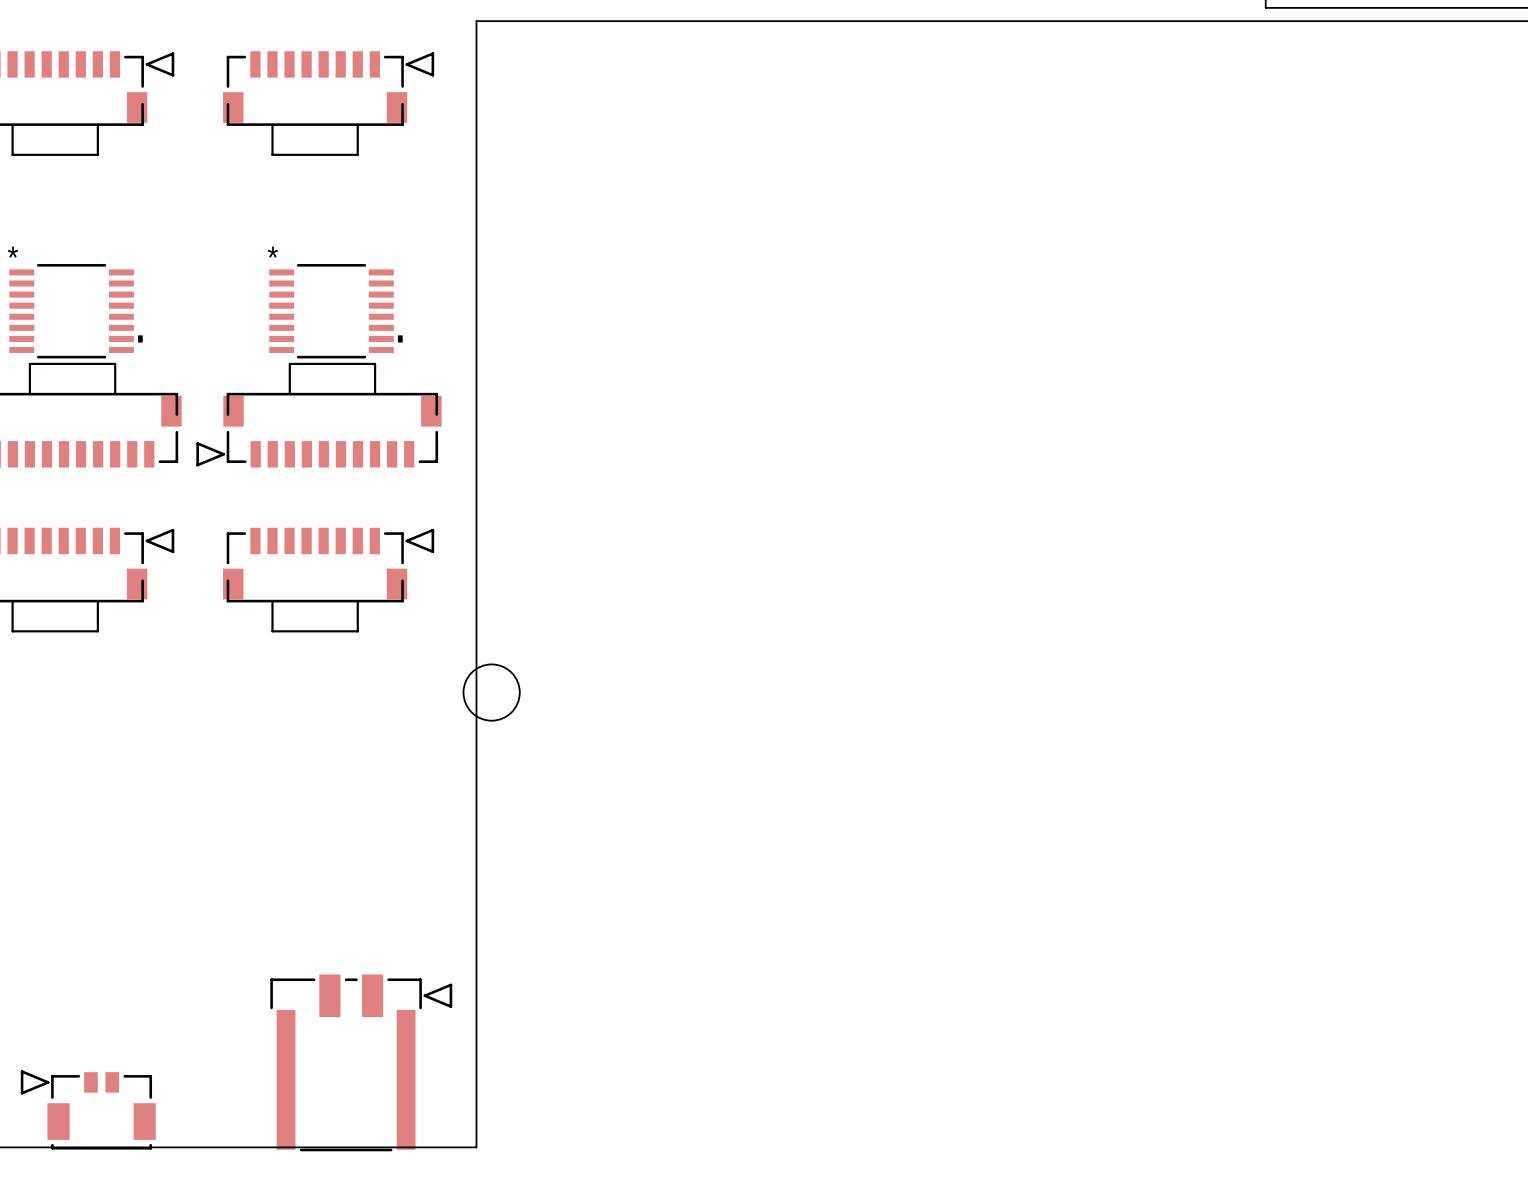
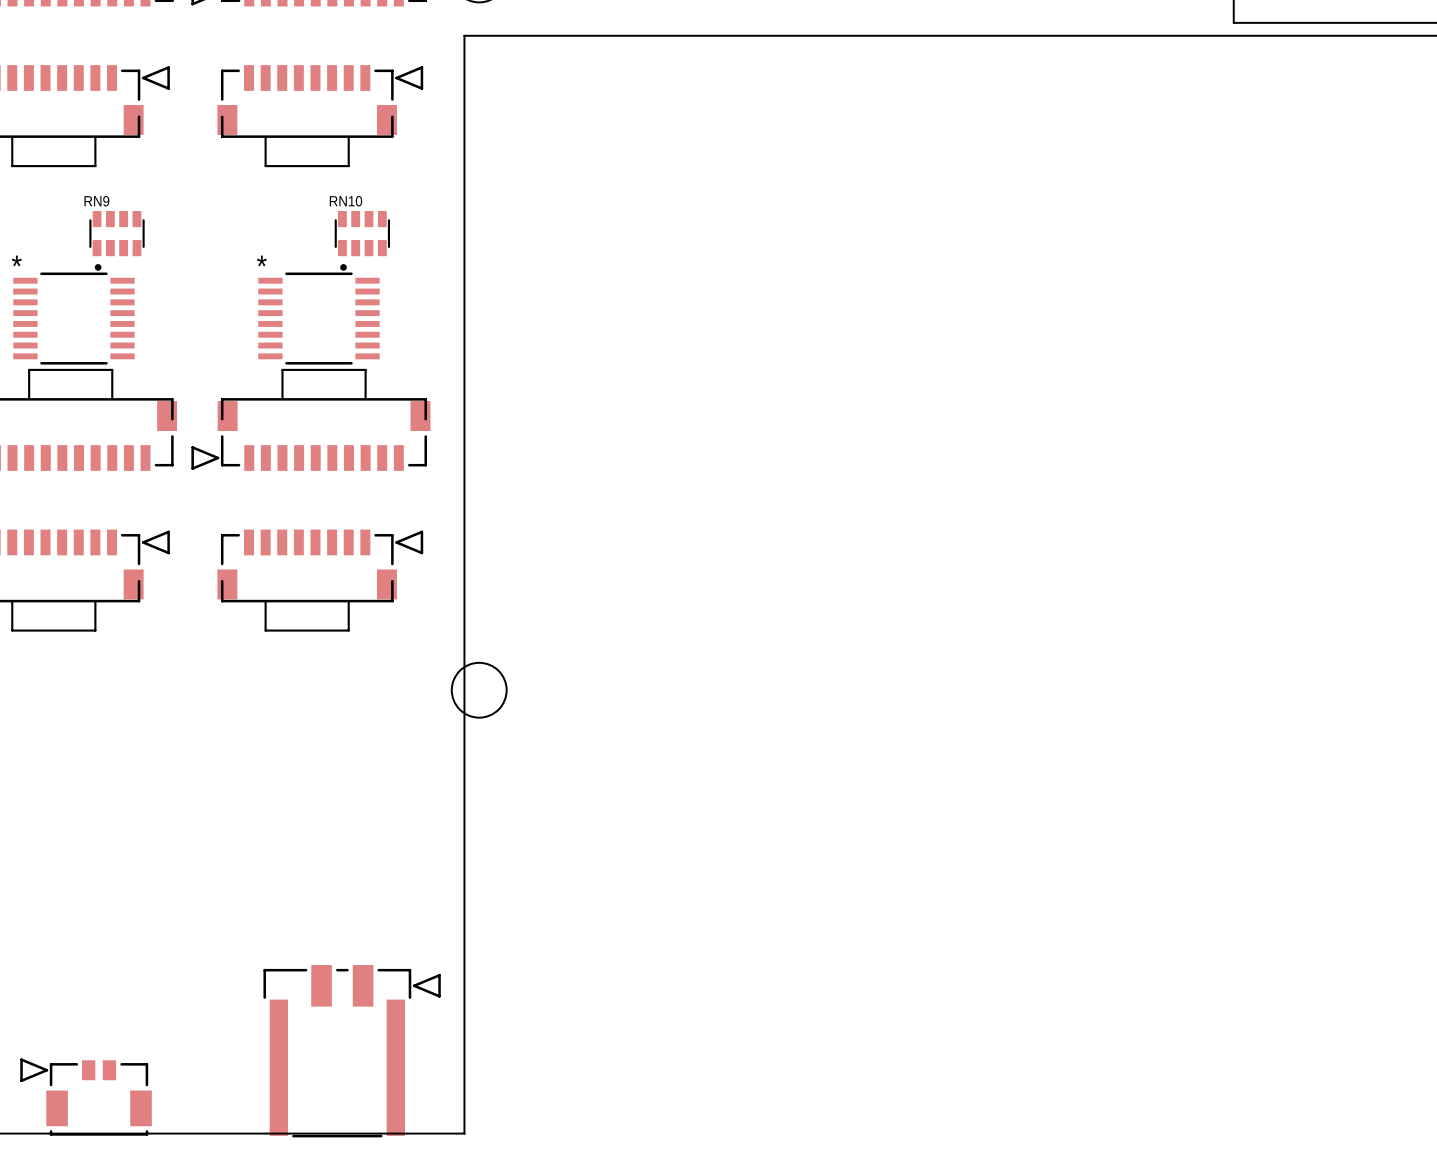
RN9: none -> (117, 240)
RN10: none -> (362, 240)
part footprint: [9, 264, 143, 359] -> [13, 272, 135, 365]
part footprint: [269, 264, 403, 359] -> [258, 272, 380, 365]

